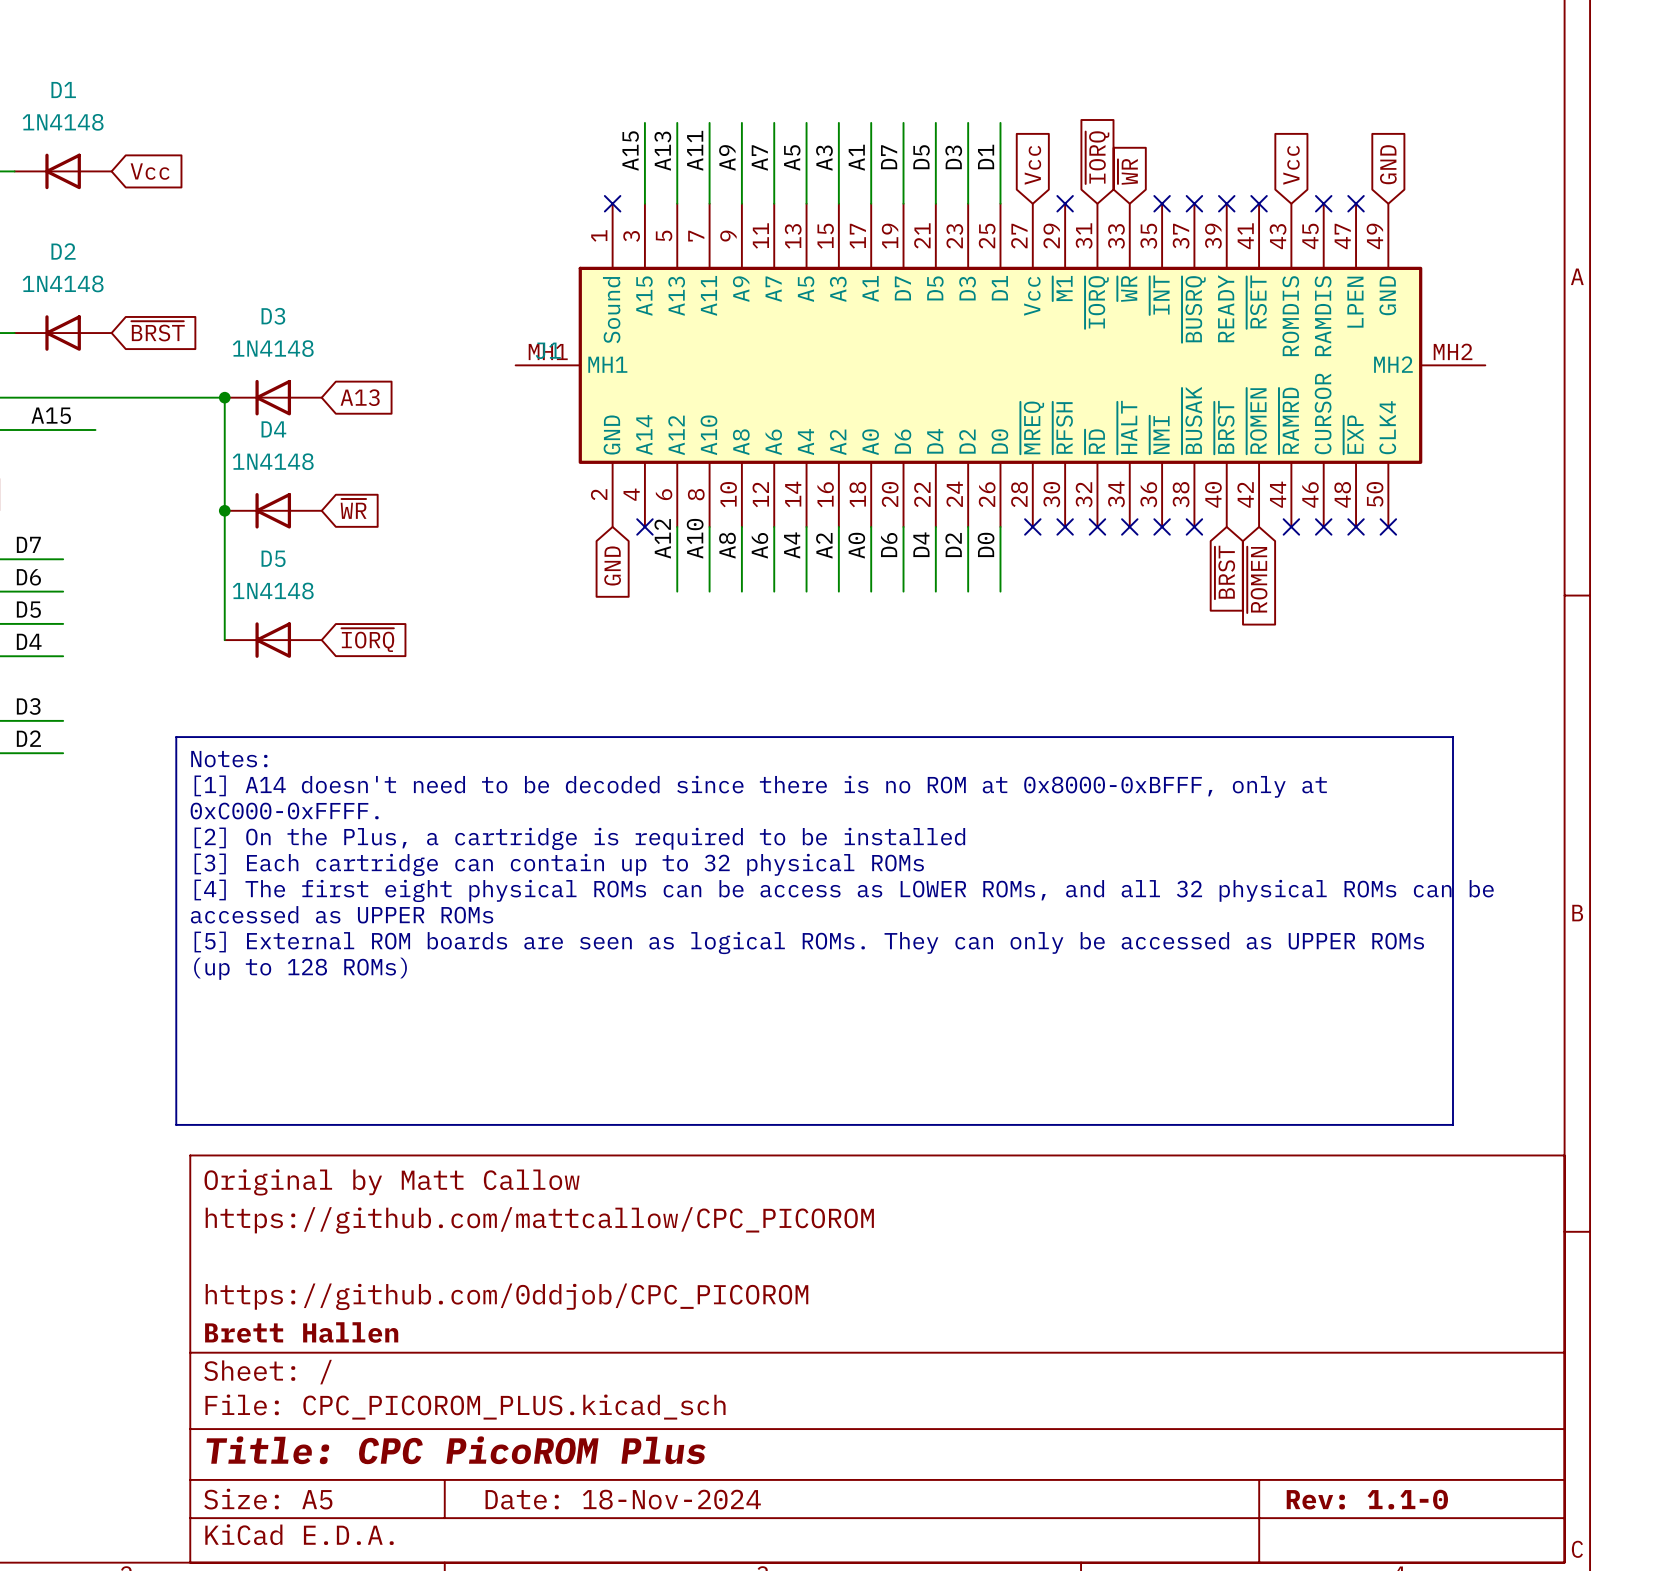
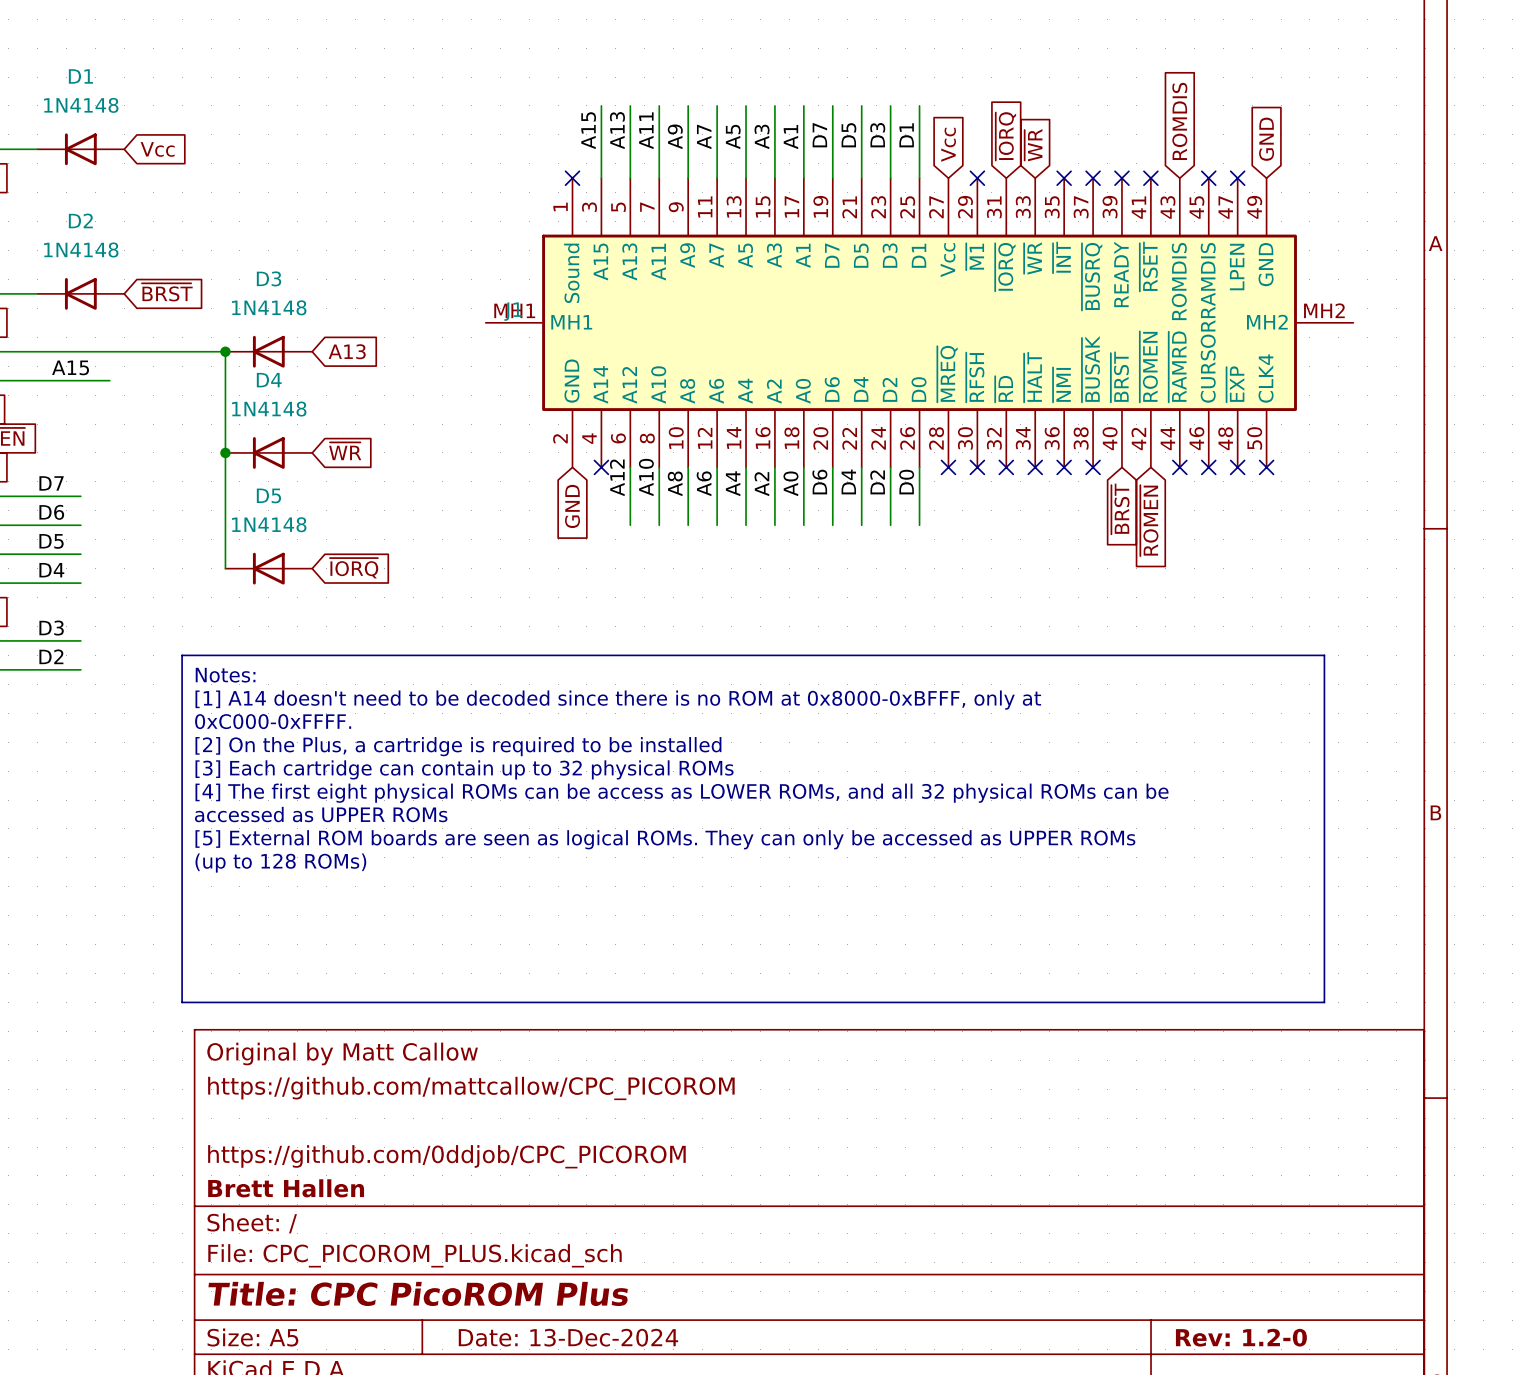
global label: Vcc (1291, 165) -> ROMDIS (1179, 121)
title block: Date: 18-Nov-2024 (623, 1499) -> Date: 13-Dec-2024 (568, 1337)
title block: Rev: 1.1-0 (1367, 1499) -> Rev: 1.2-0 (1241, 1337)

